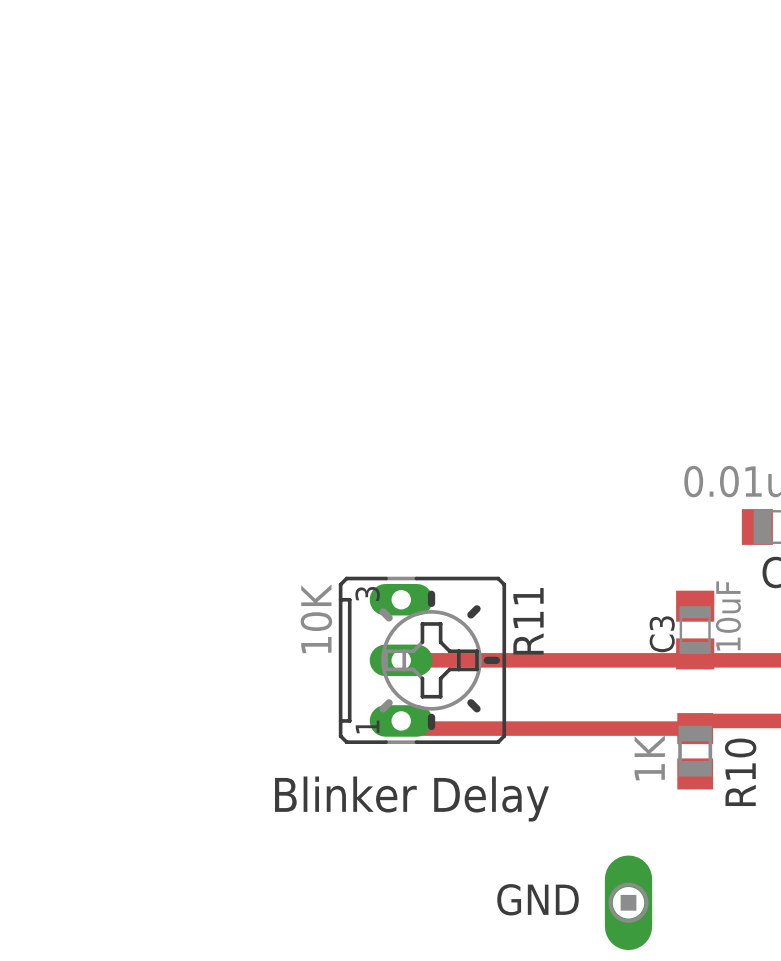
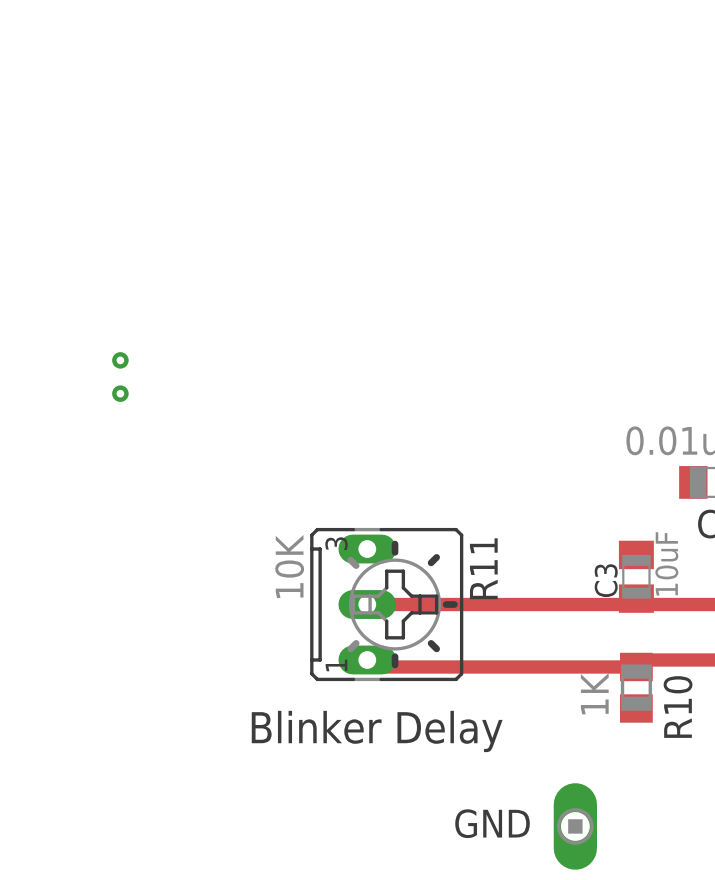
via: none -> (120, 360)
via: none -> (120, 393)

